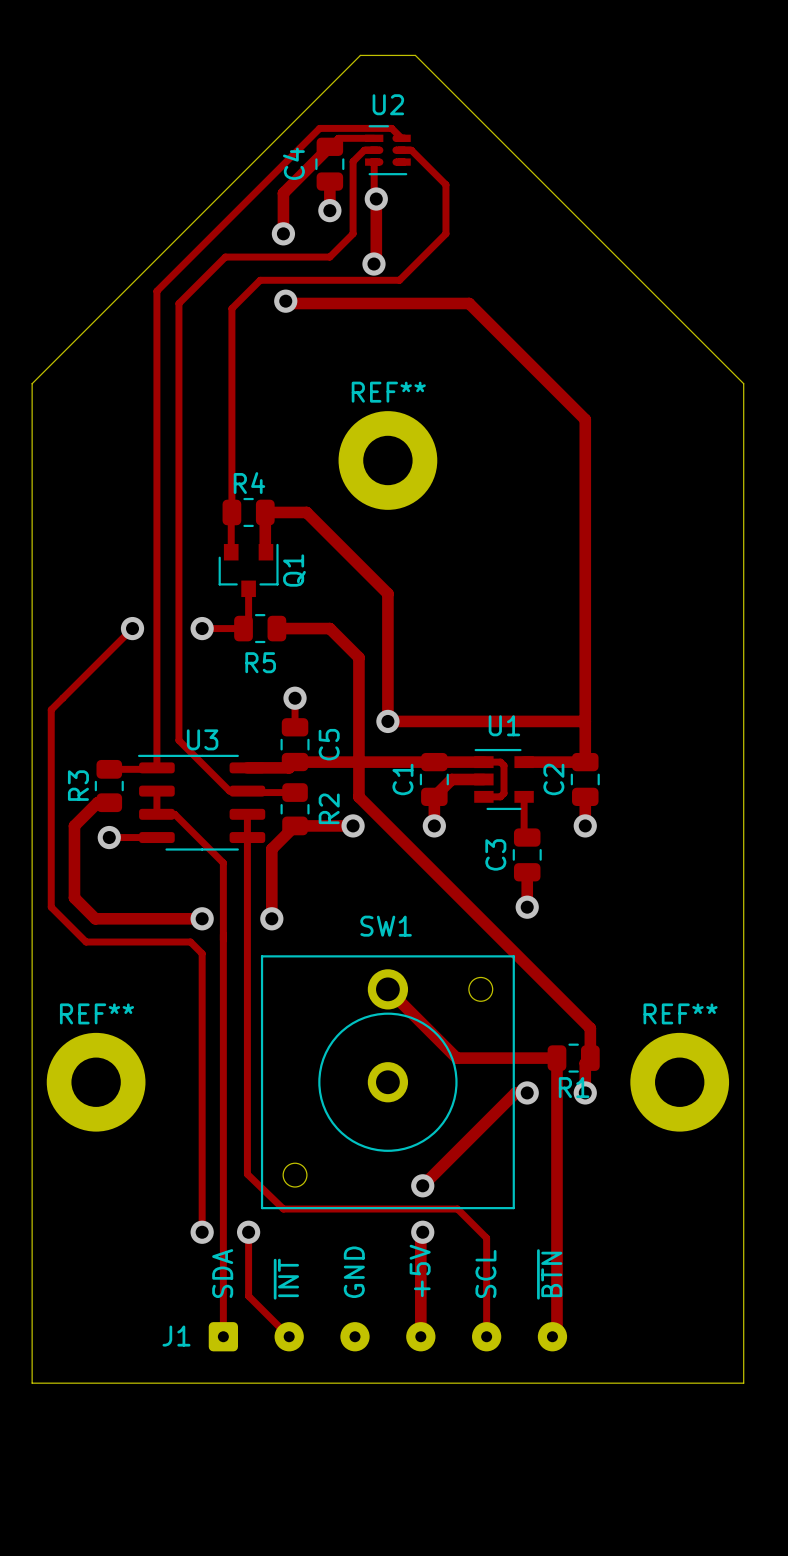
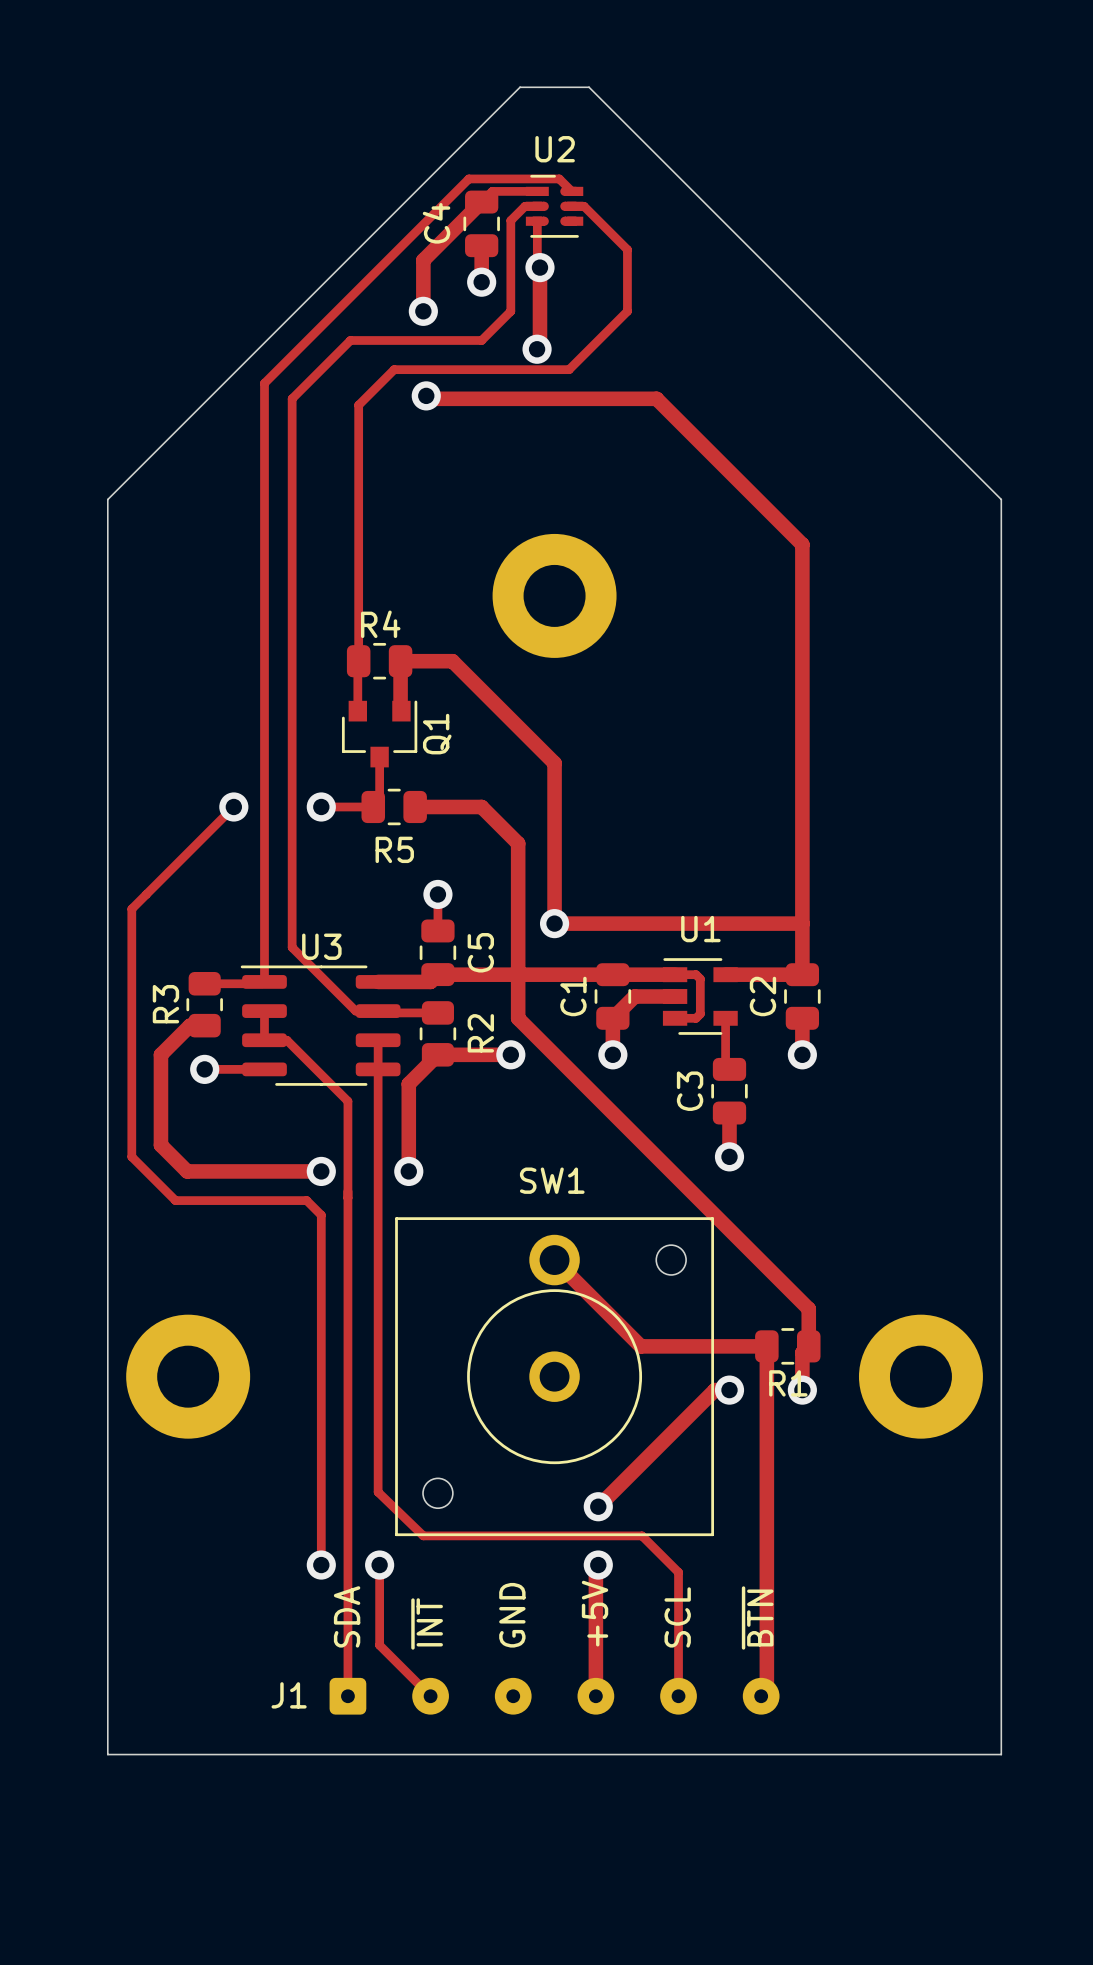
REF** name: REF** (388, 392) -> none
REF** name: REF** (96, 1013) -> none
REF** name: REF** (680, 1013) -> none

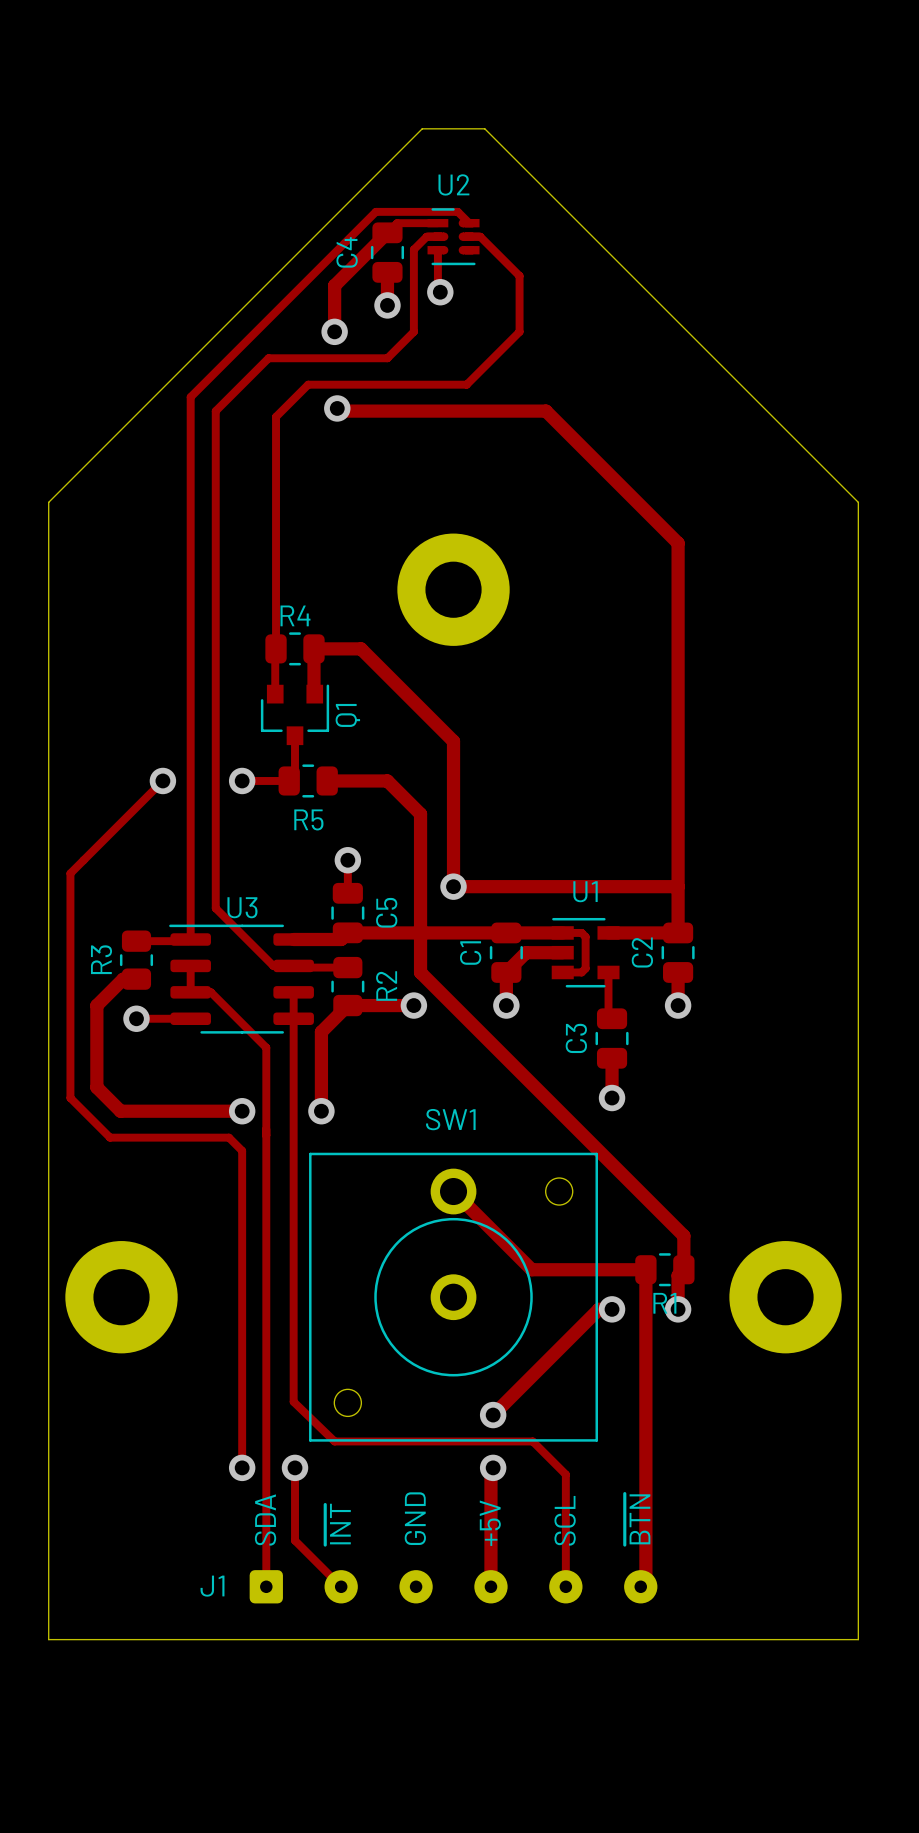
track: (539, 267) (539, 346) (537, 349) -> none
via: (537, 349) -> none

